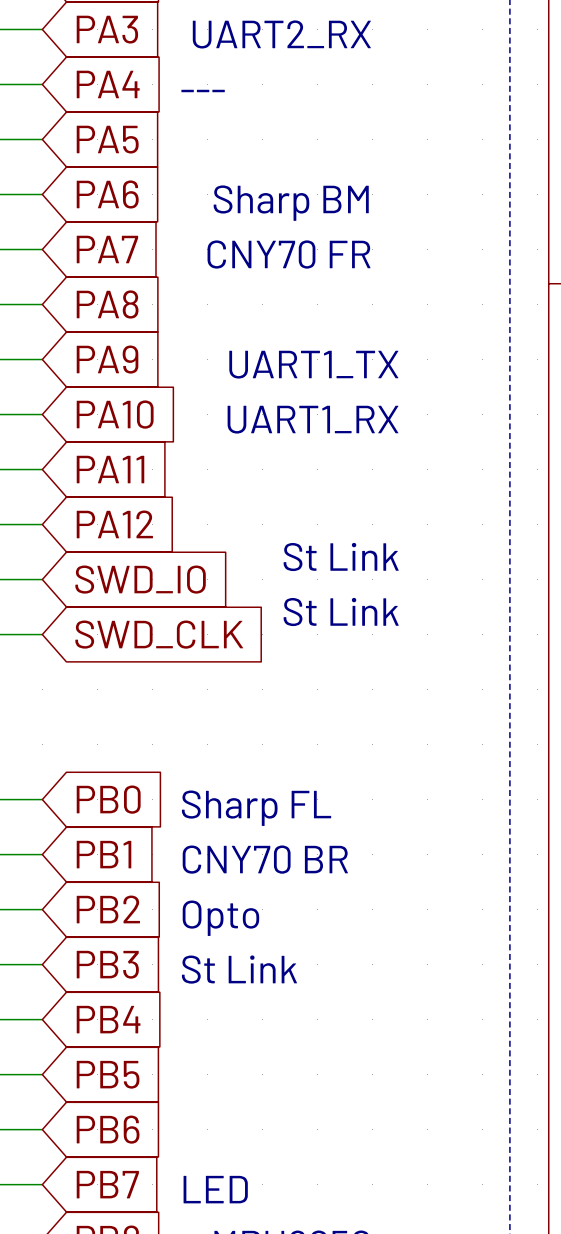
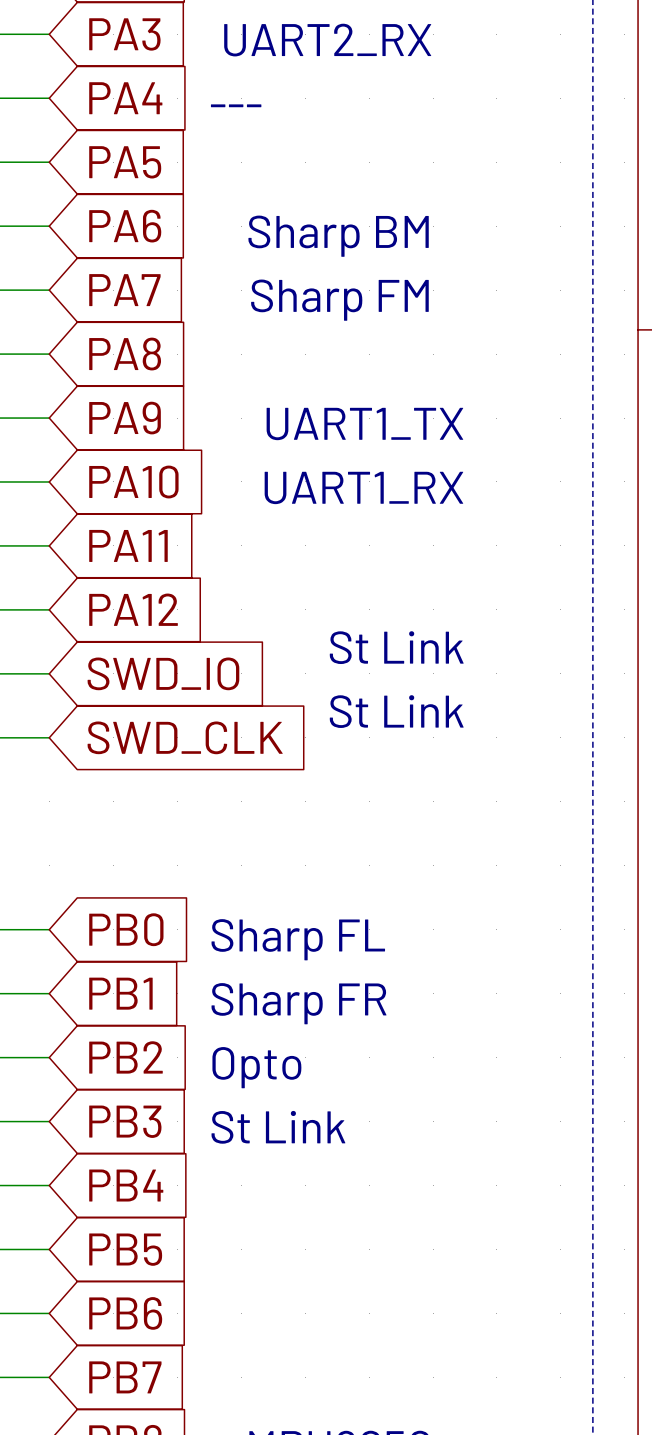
text: CNY70 FR (289, 254) -> Sharp FM (339, 300)
text: CNY70 BR (265, 859) -> Sharp FR (298, 1003)
text: LED (215, 1189) -> none

